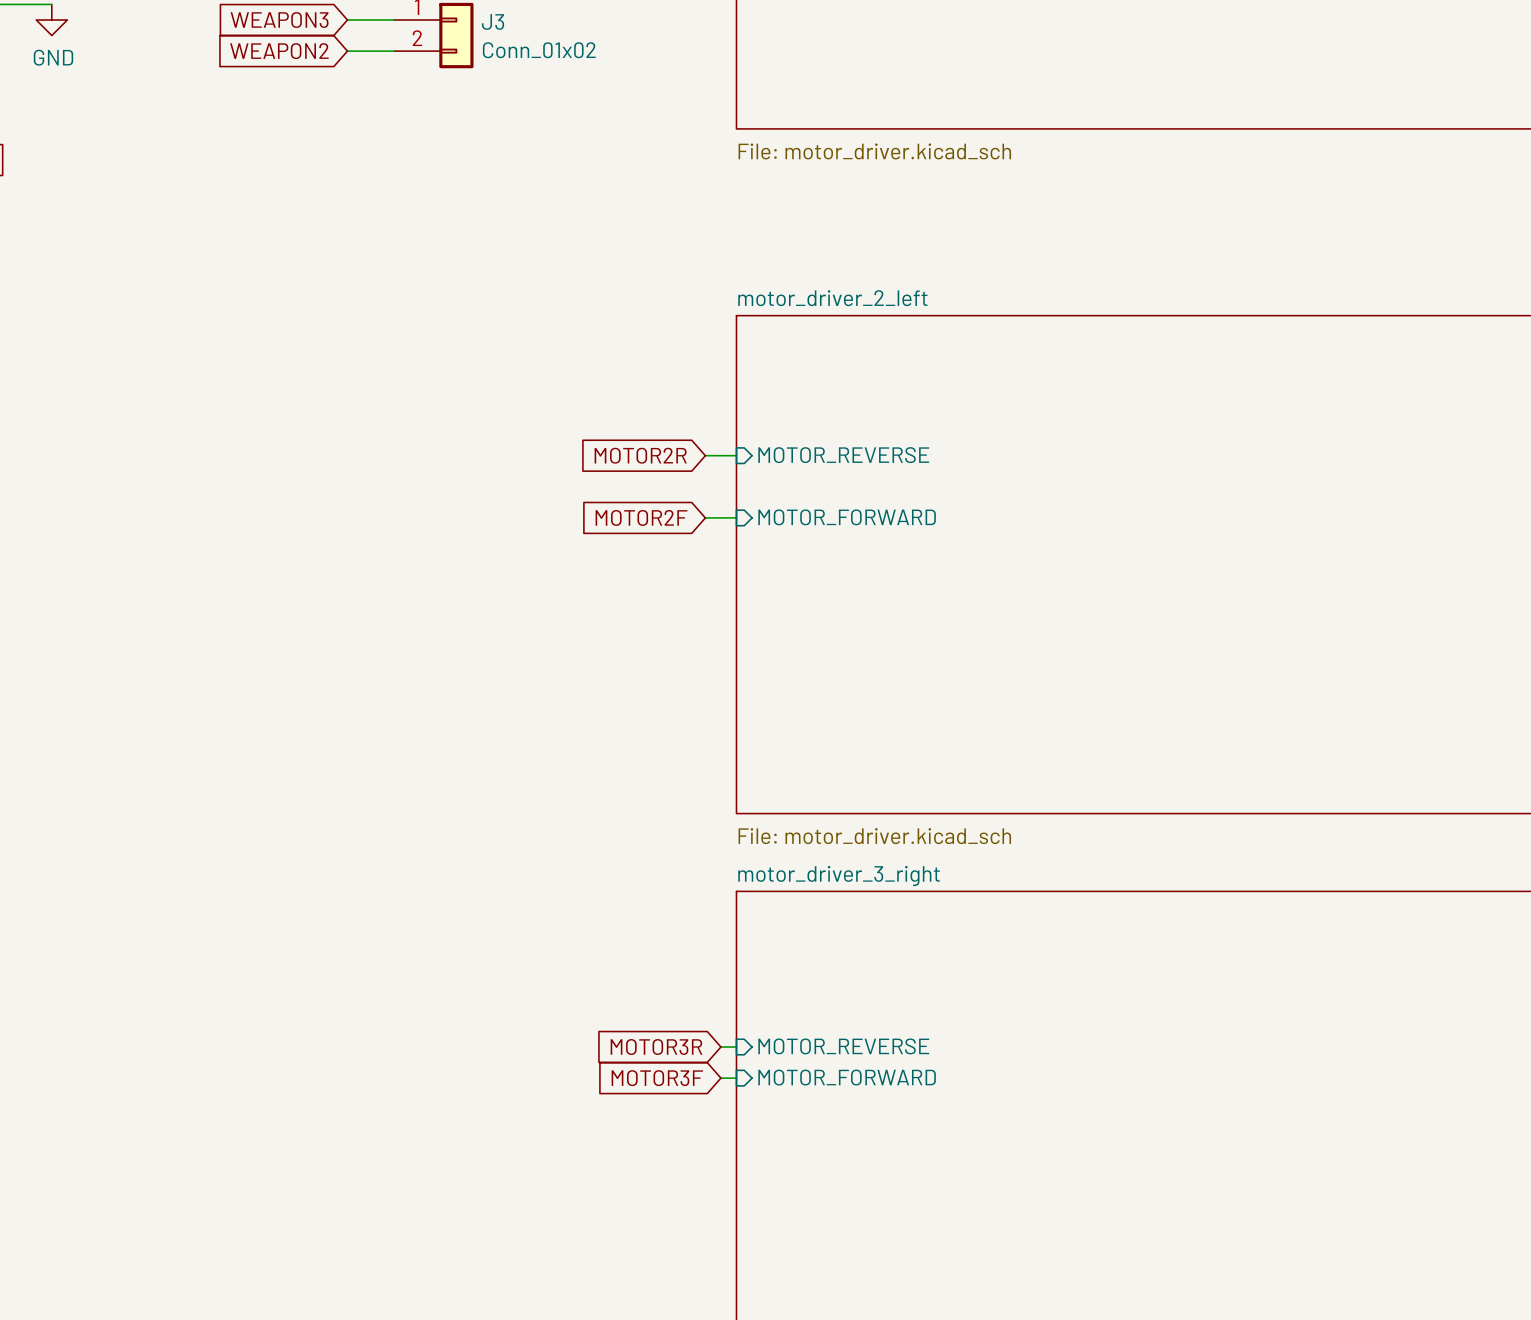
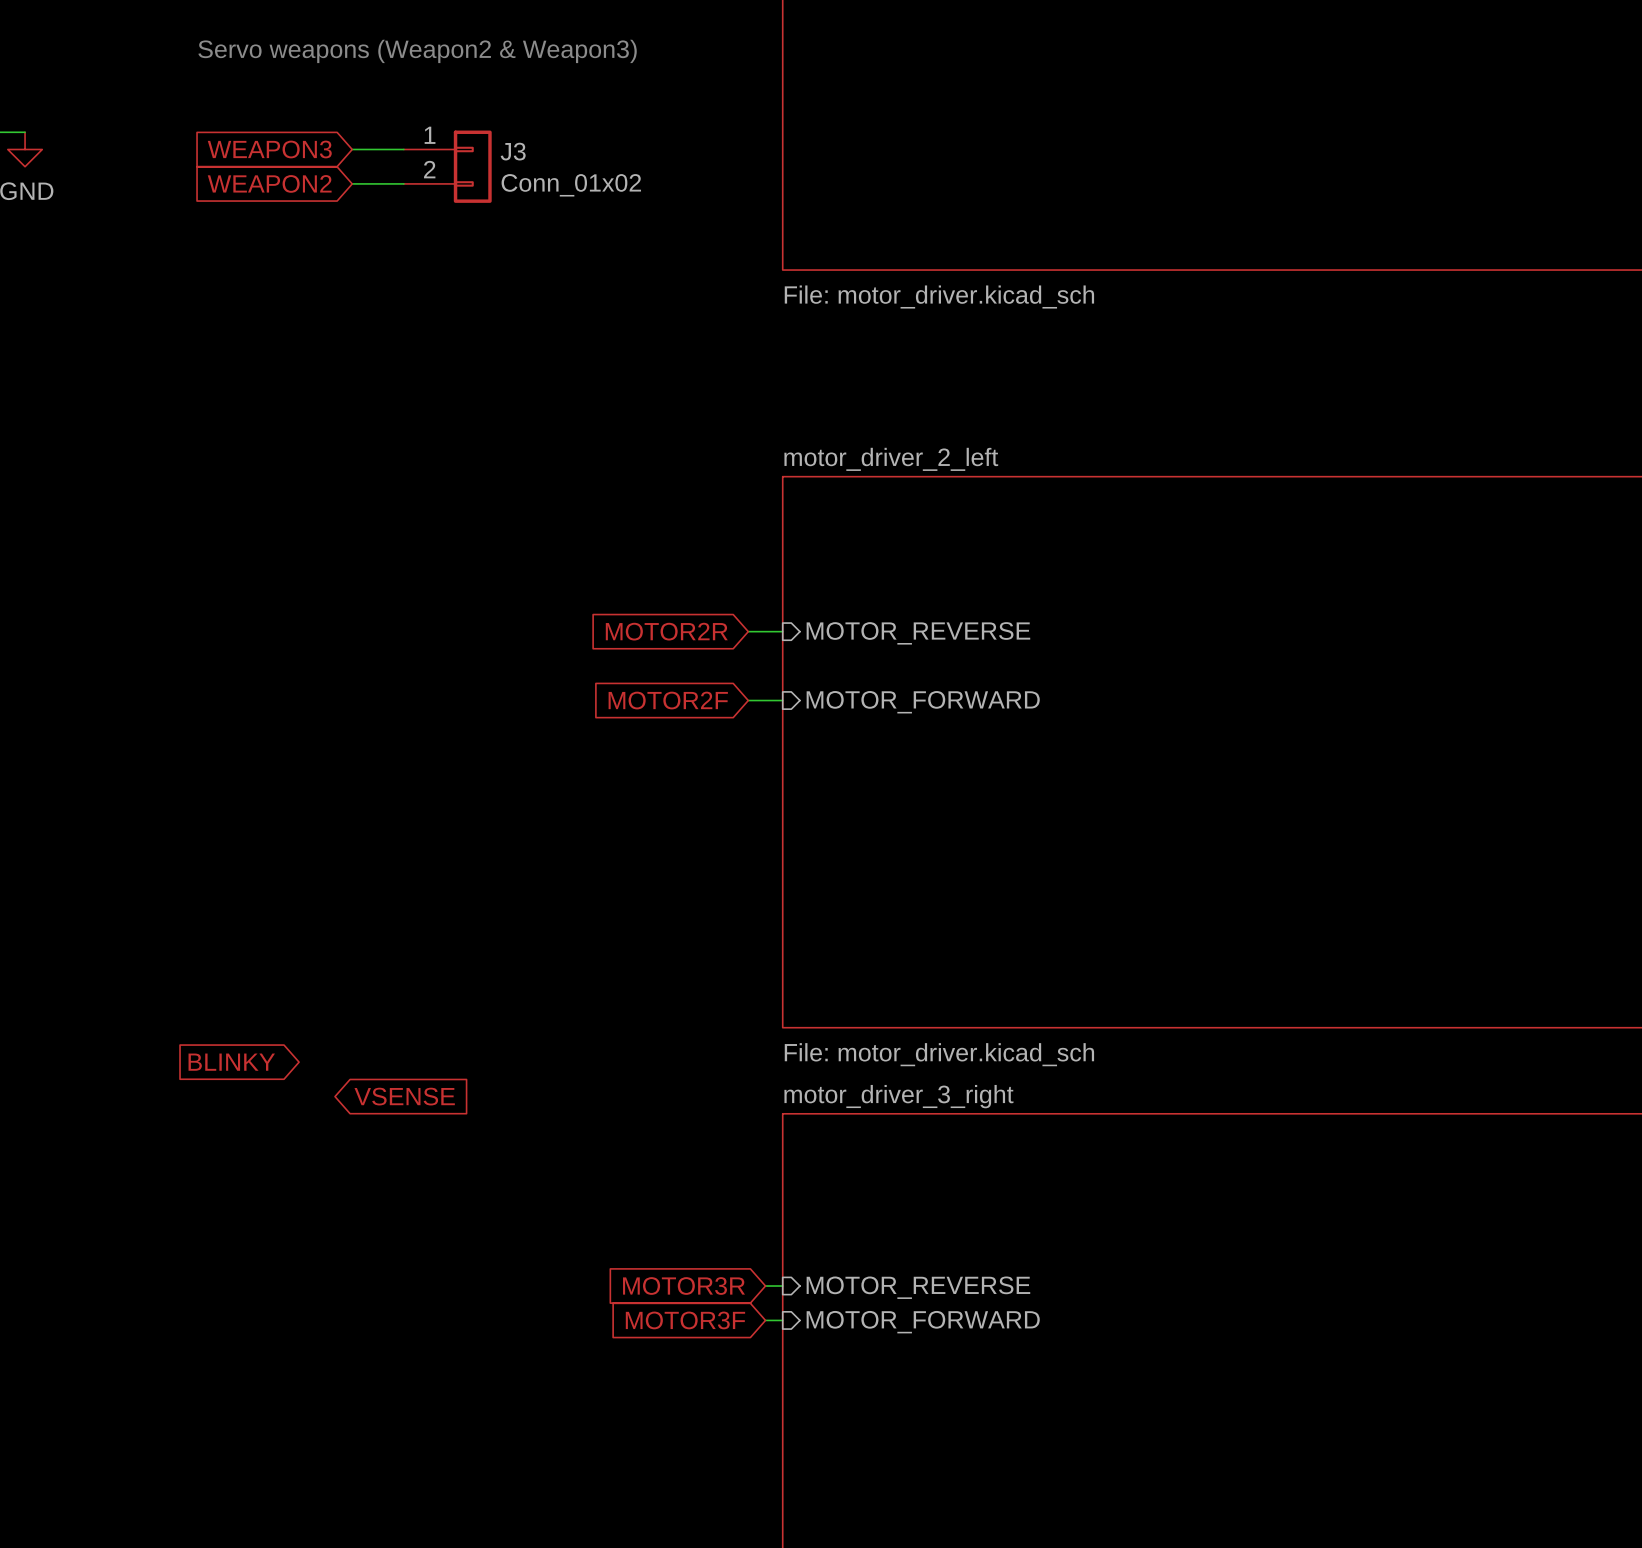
global label: none -> BLINKY (231, 1062)
global label: none -> VSENSE (404, 1096)

